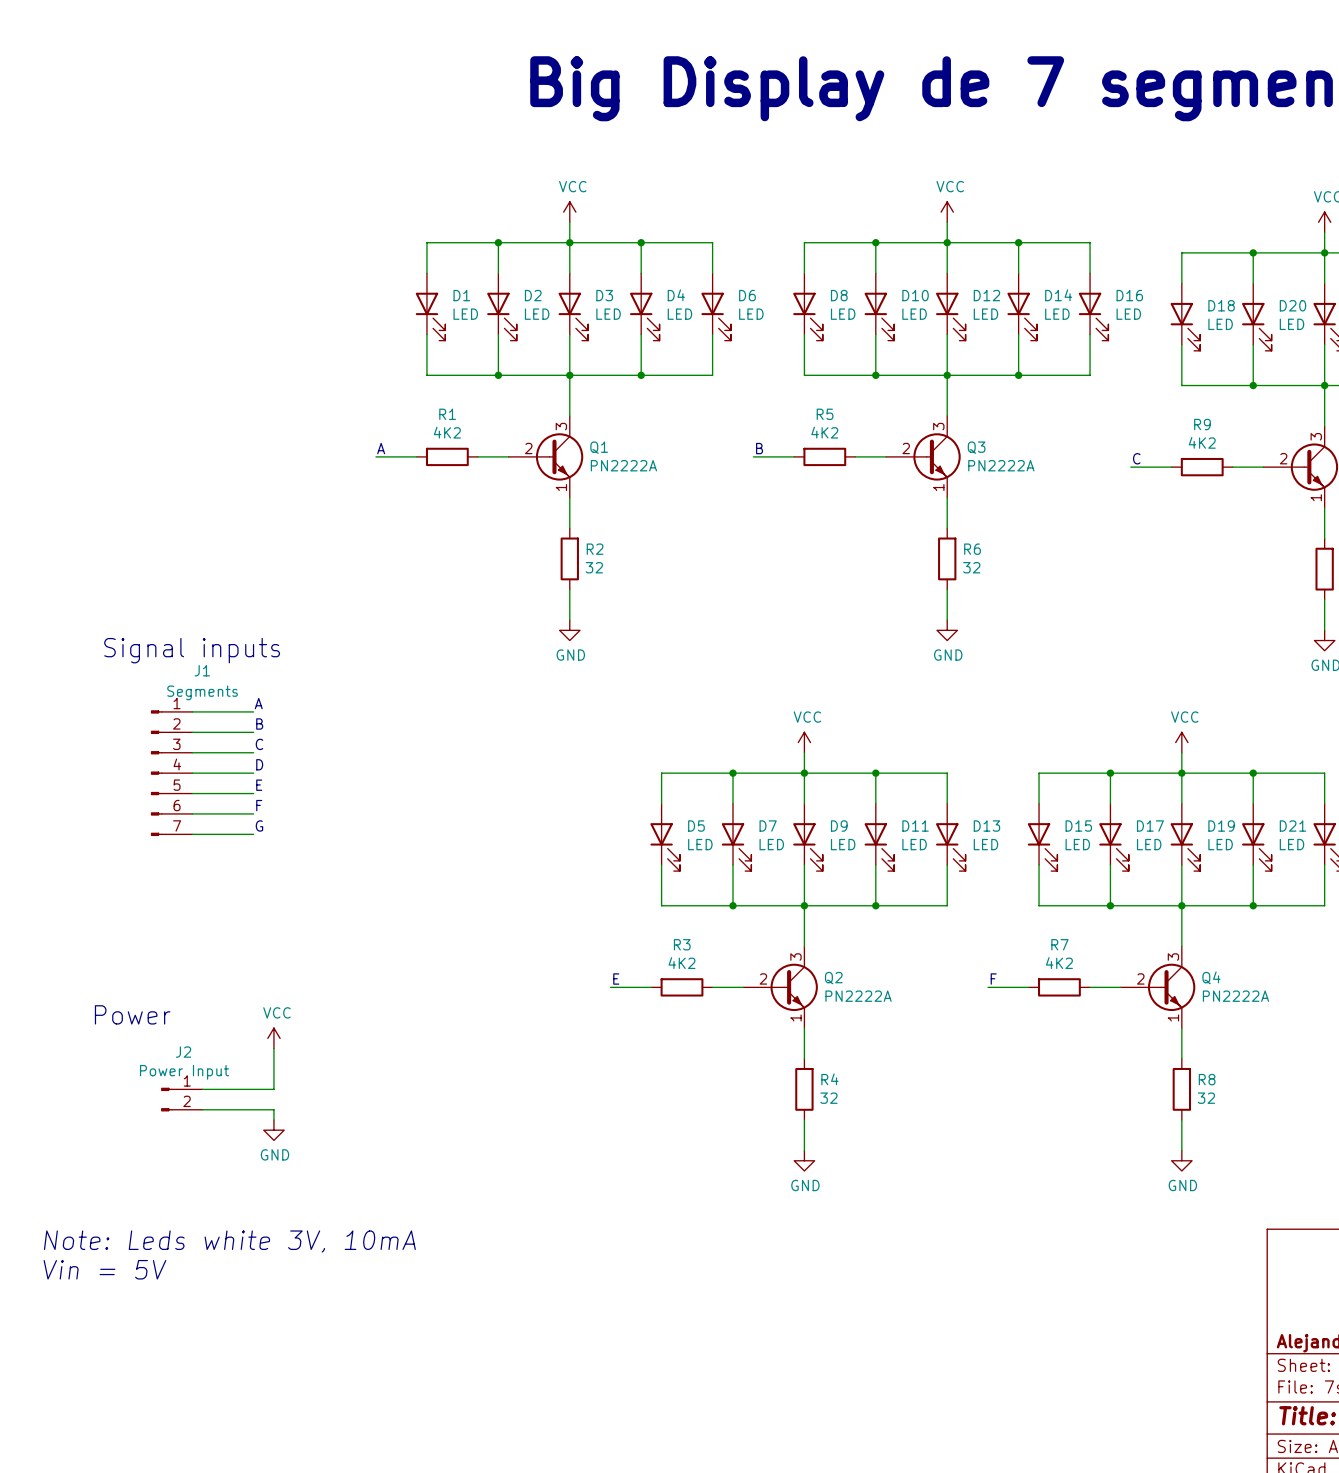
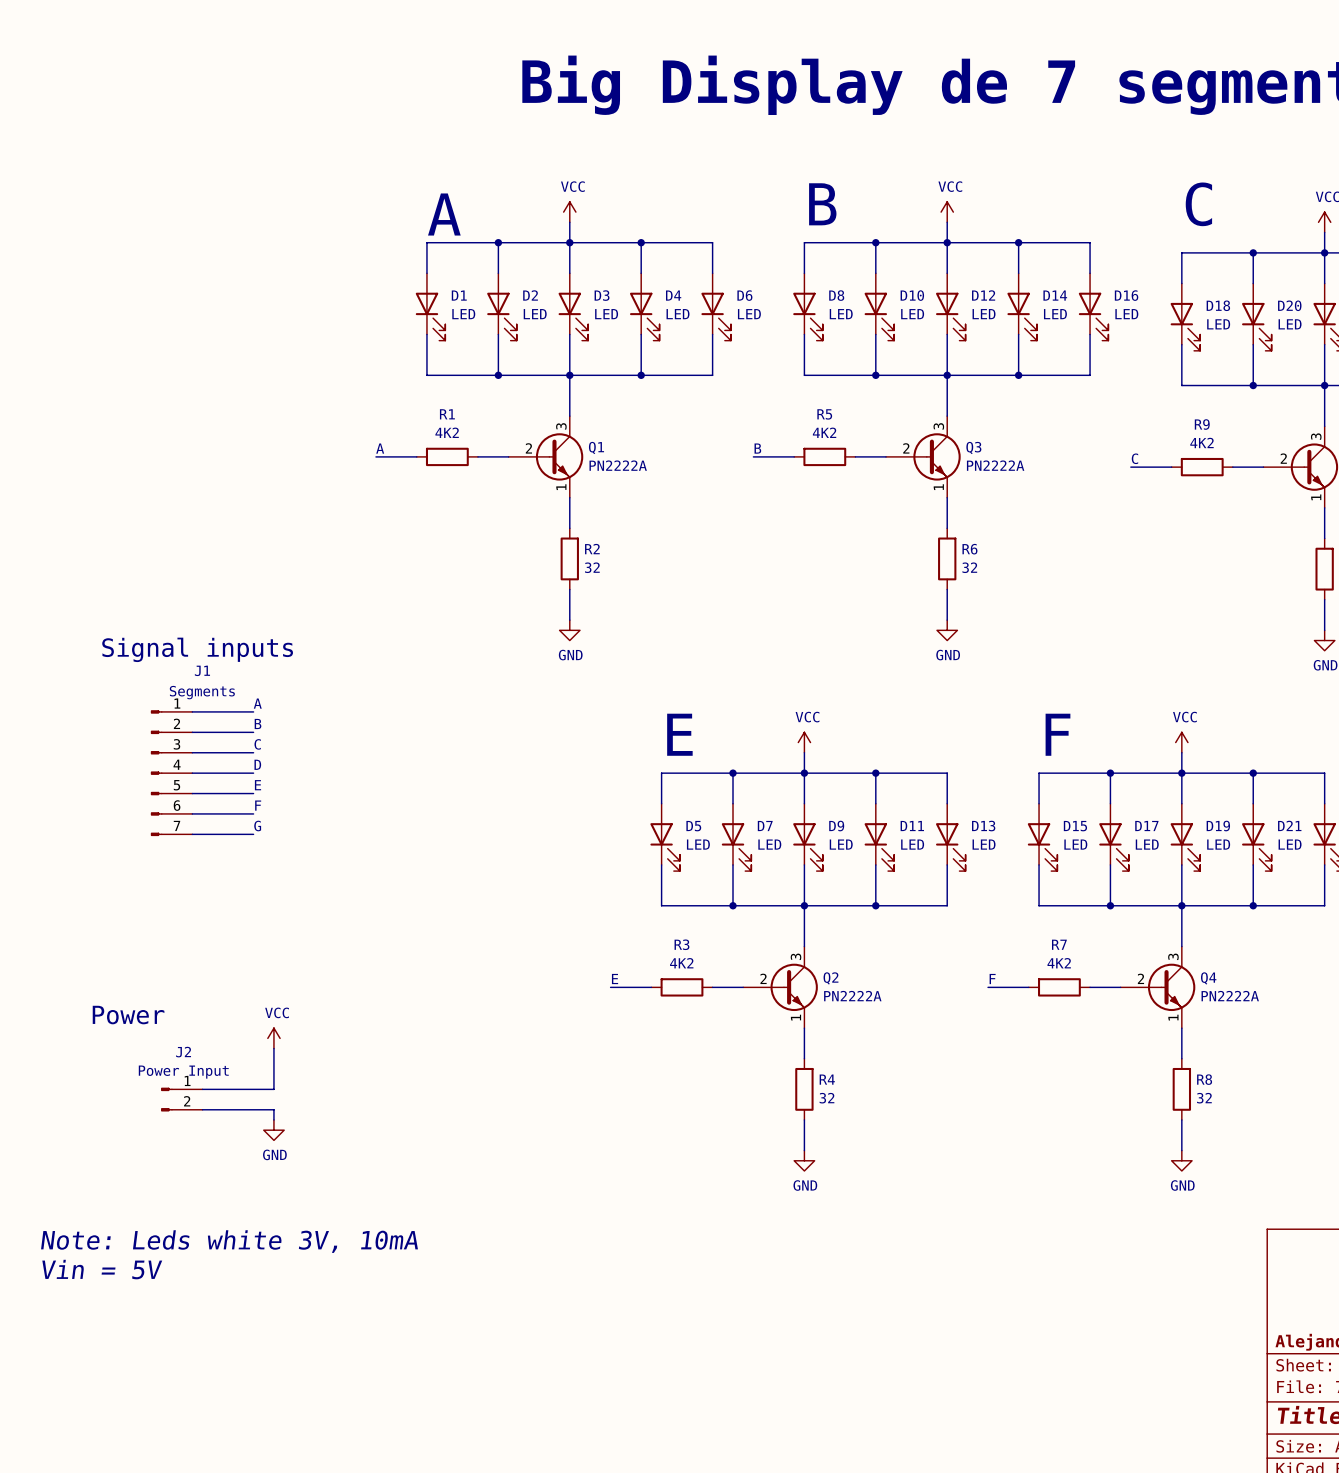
text: none -> B (822, 204)
text: none -> C (1198, 204)
text: none -> A (444, 214)
text: none -> E (679, 734)
text: none -> F (1057, 734)

